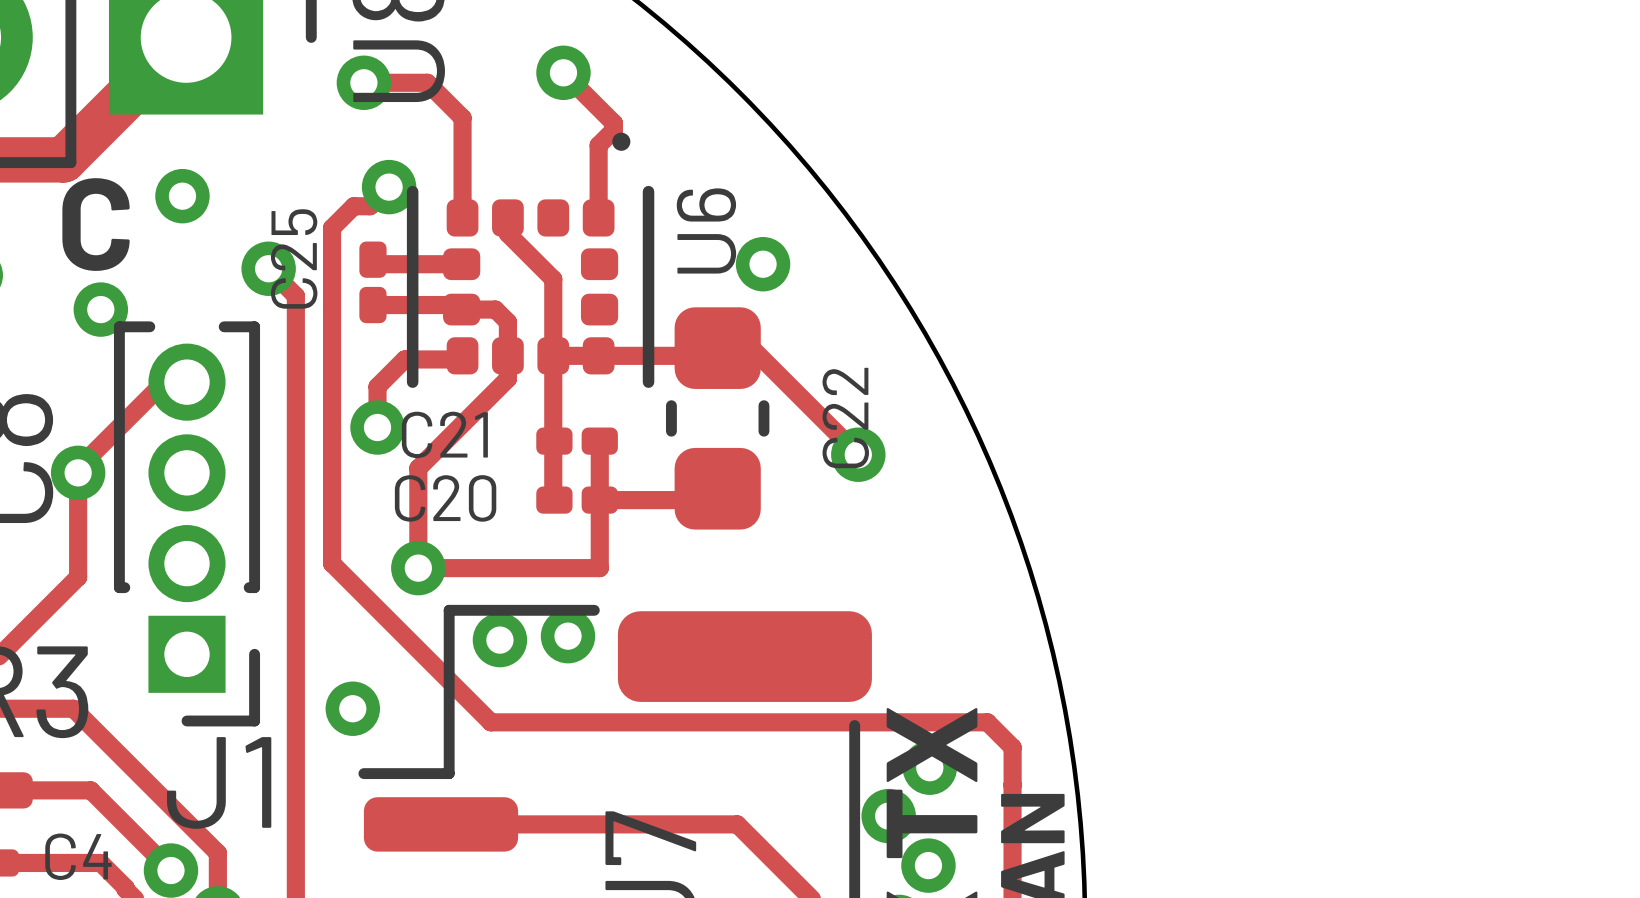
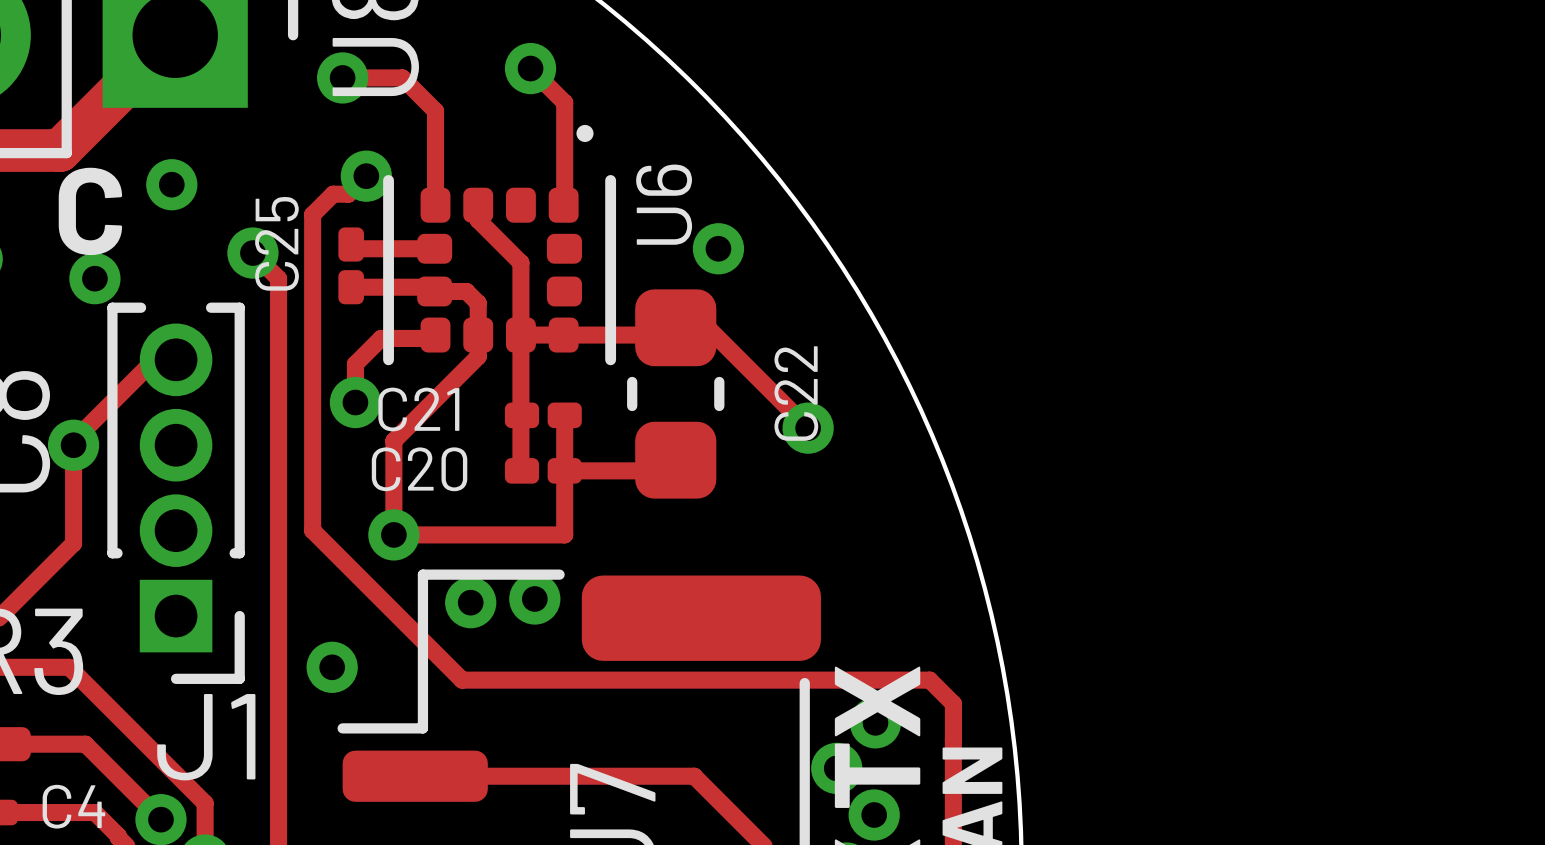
track: (599, 109) (613, 123) (613, 130) (598, 145) (598, 217) -> (564, 102) (564, 205)
U6 name position: U6 (706, 230) -> U6 (664, 204)
via position: (100, 309) -> (94, 278)

